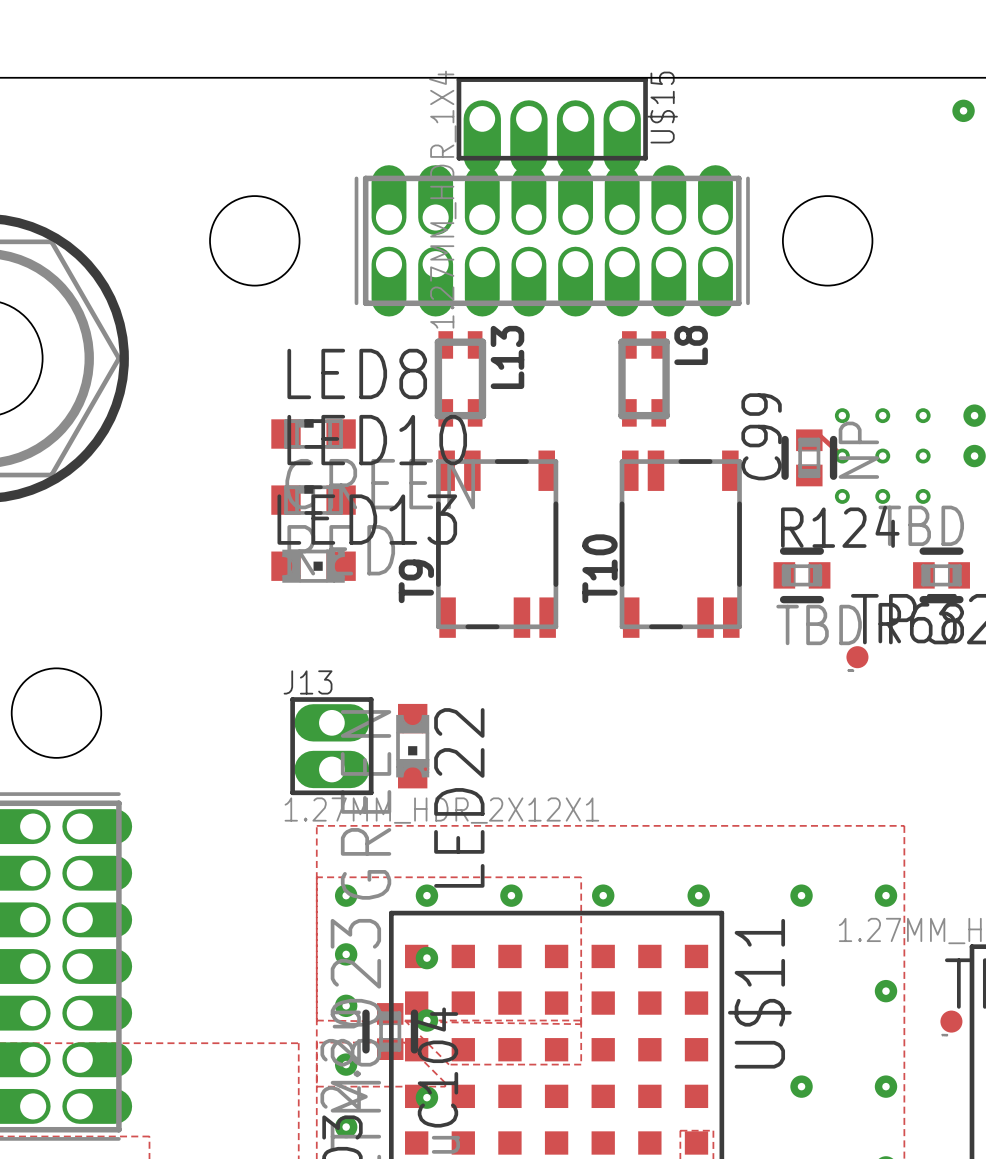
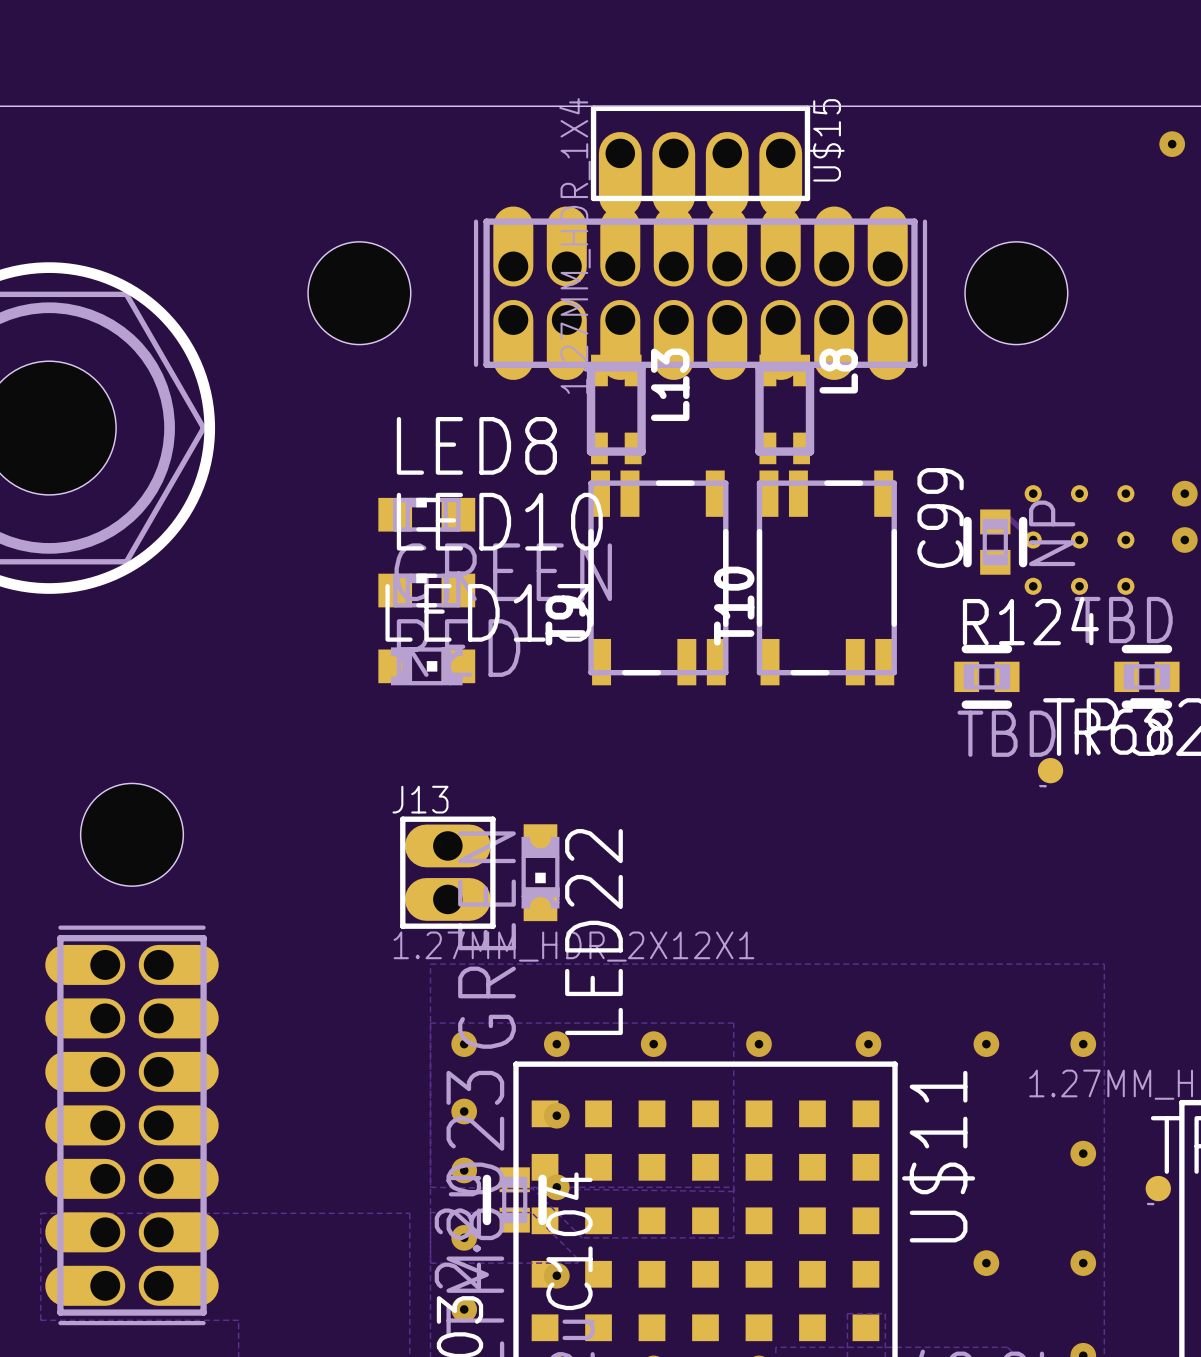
L13 position: (460, 378) -> (616, 409)
L8 position: (644, 378) -> (784, 409)
T9 position: (497, 544) -> (658, 577)
T10 position: (680, 544) -> (826, 577)

